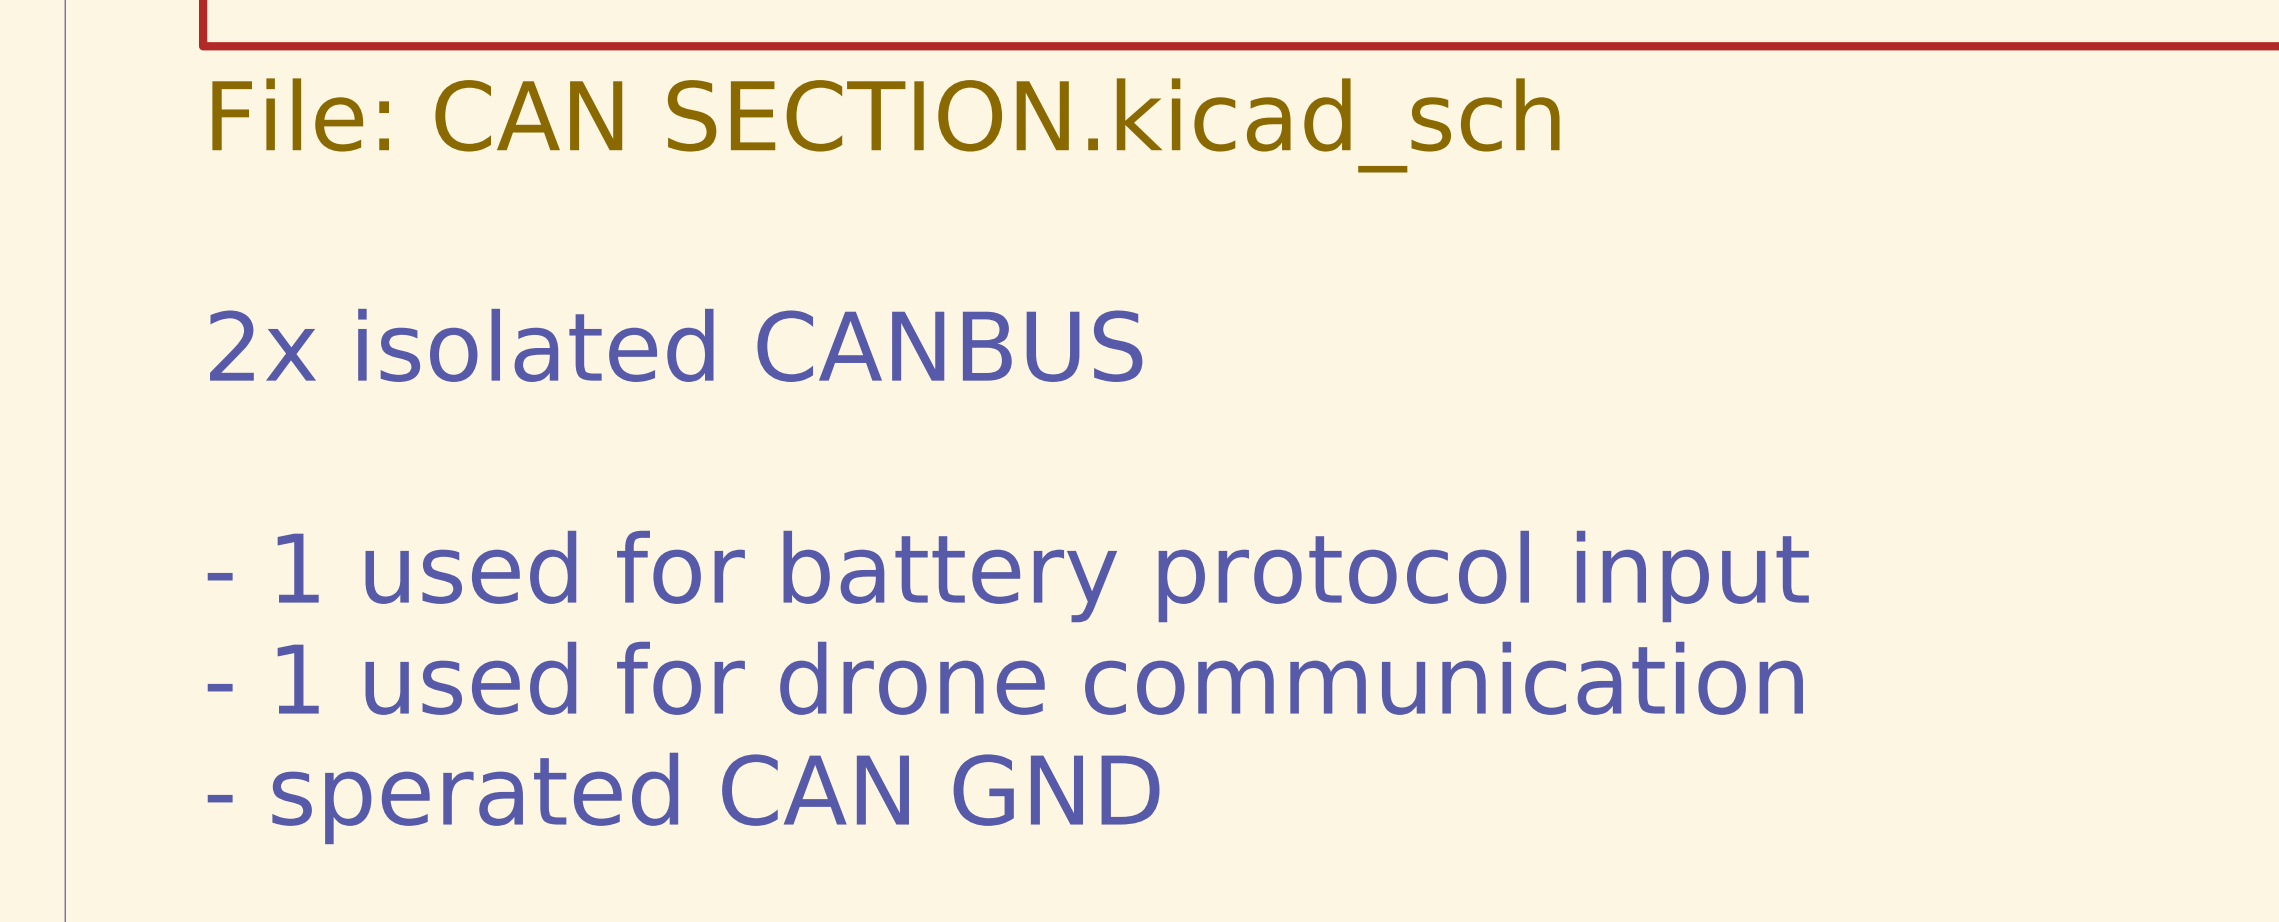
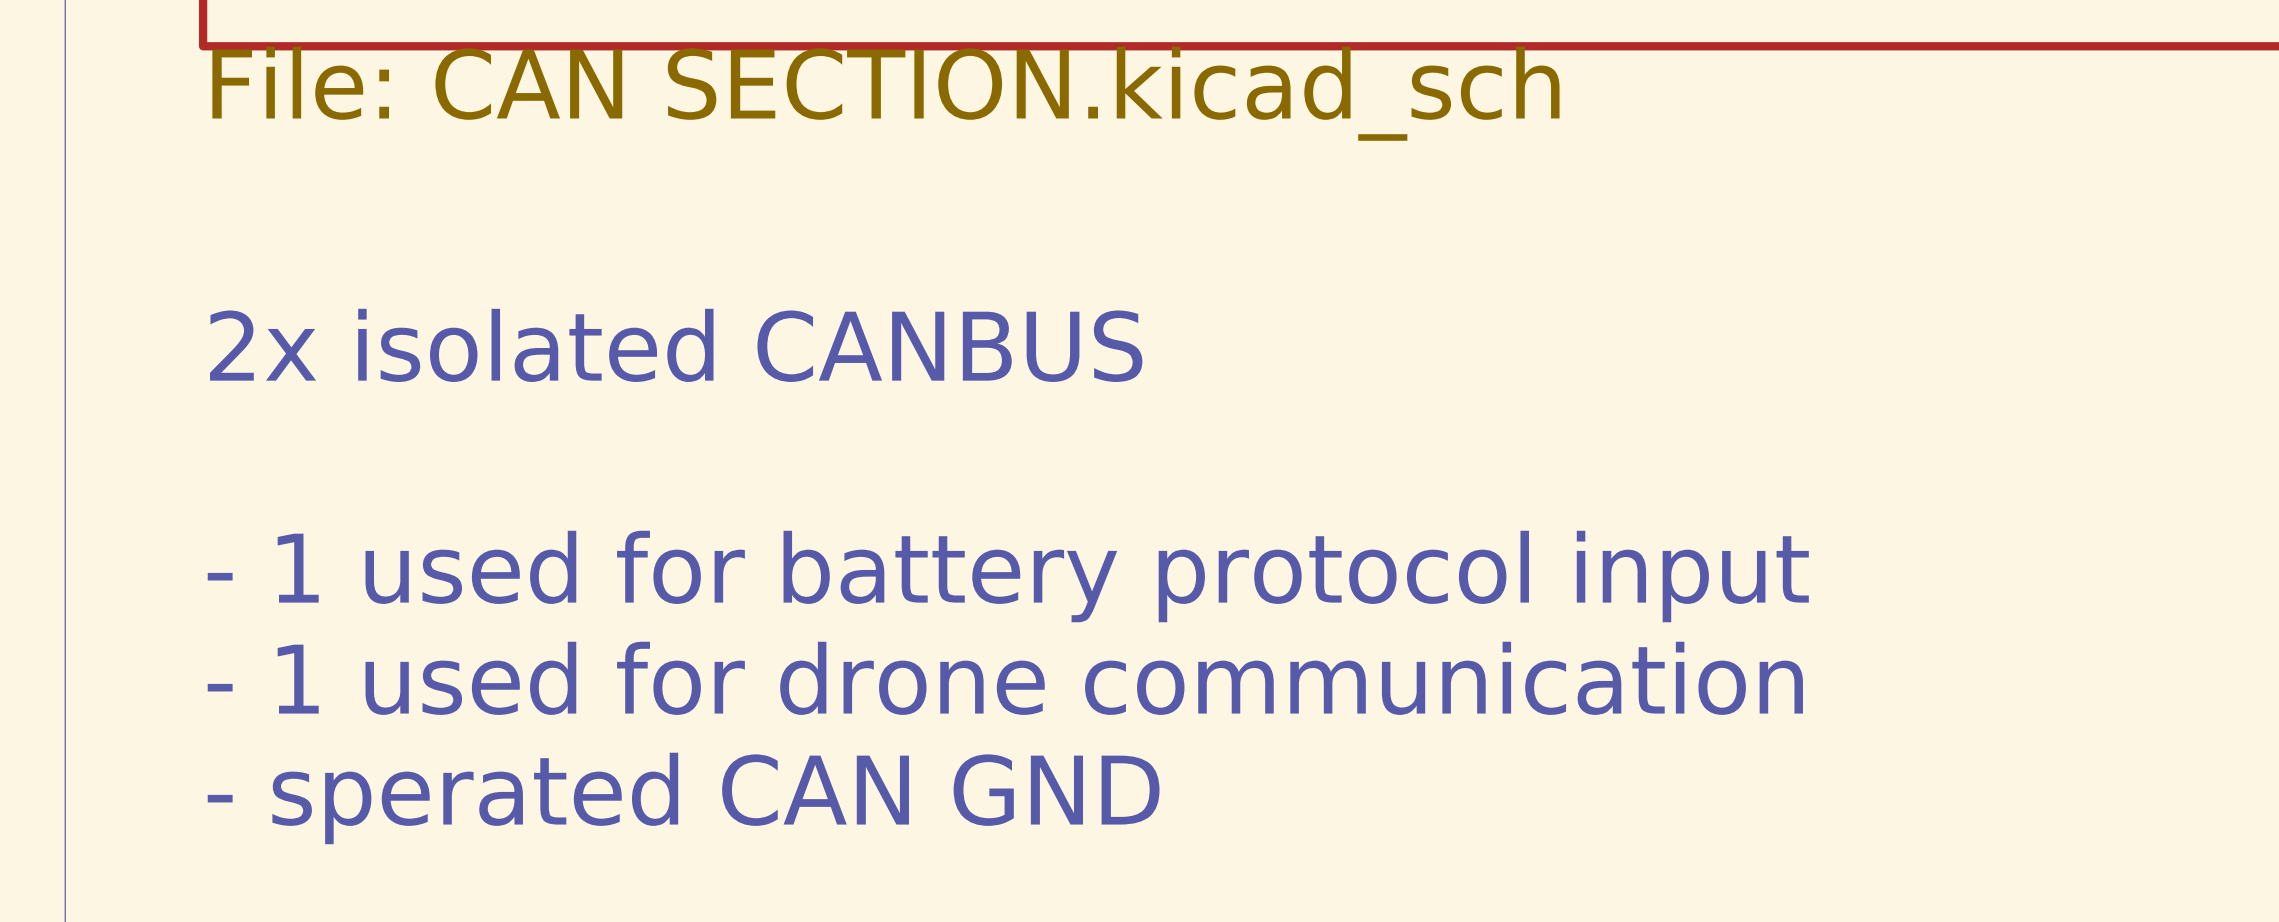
sheet value position: File: CAN SECTION.kicad_sch (885, 125) -> File: CAN SECTION.kicad_sch (885, 93)

